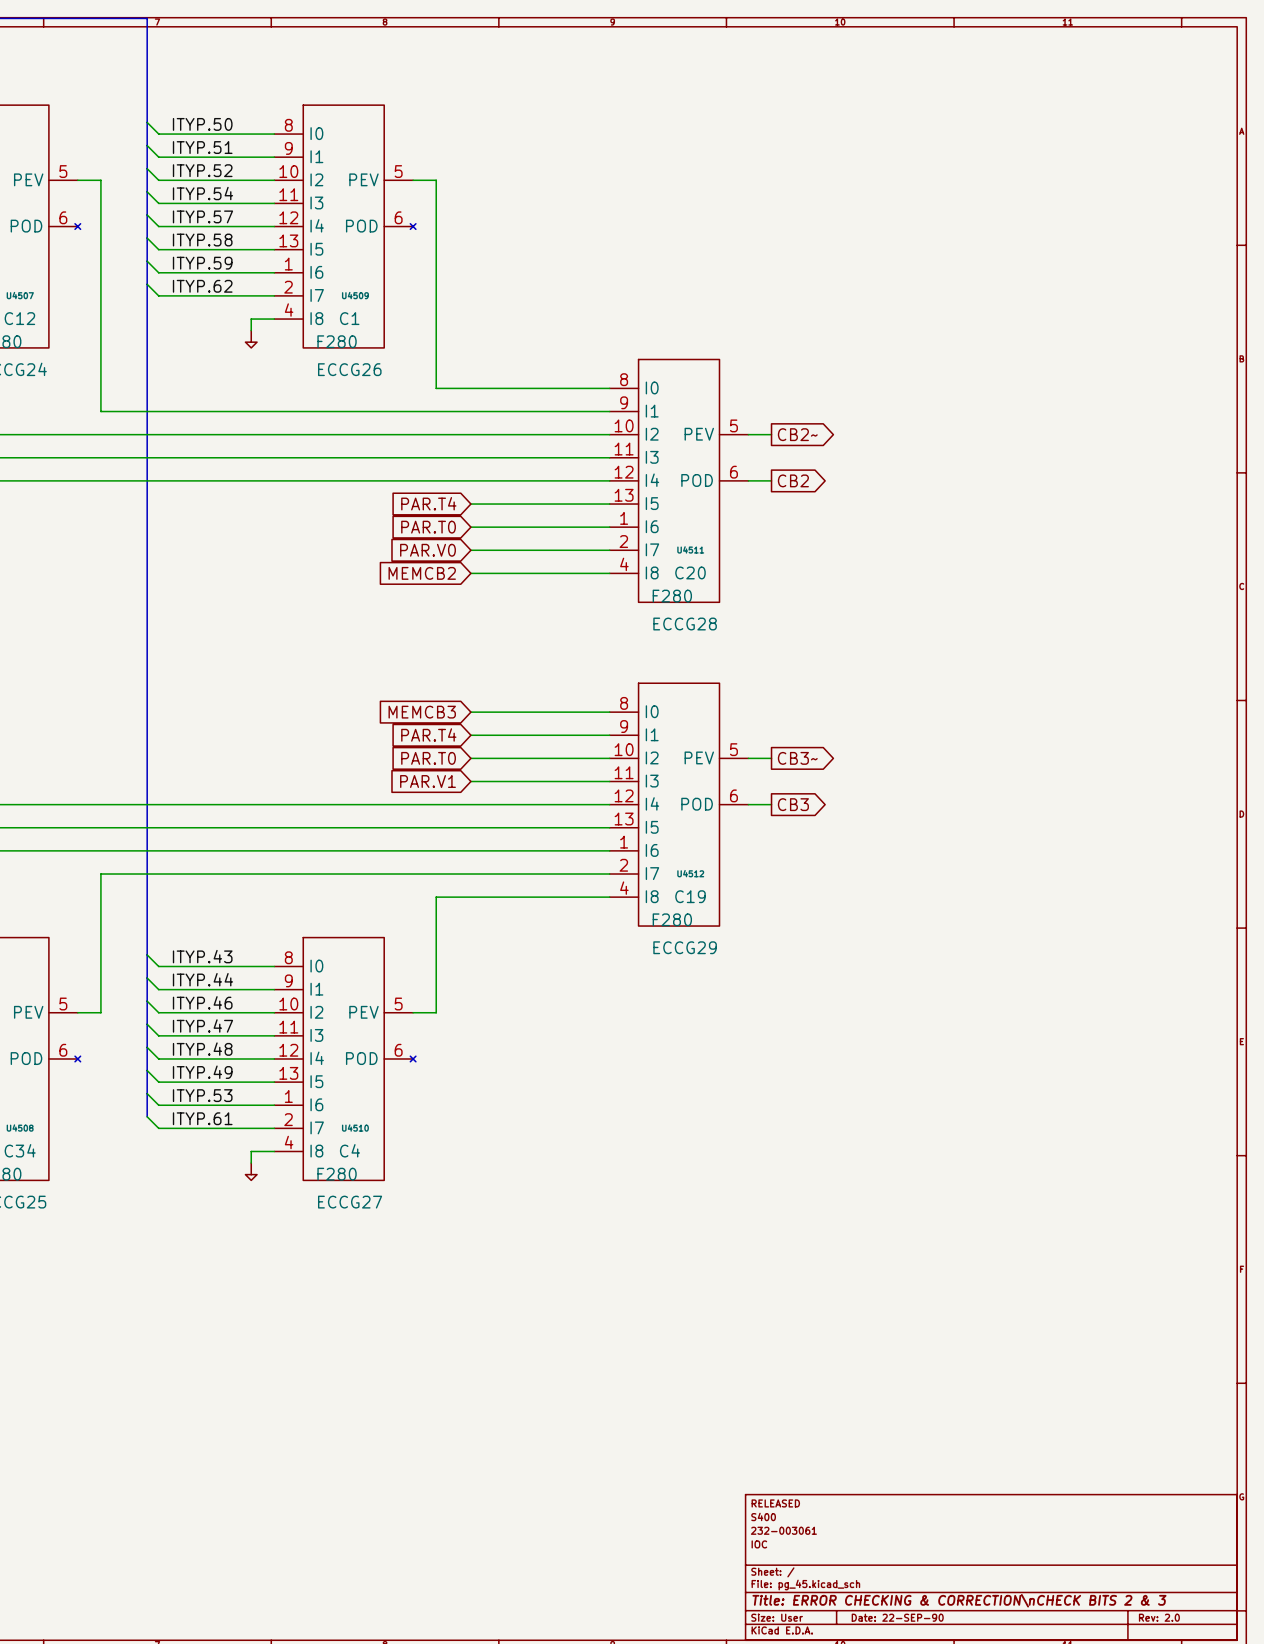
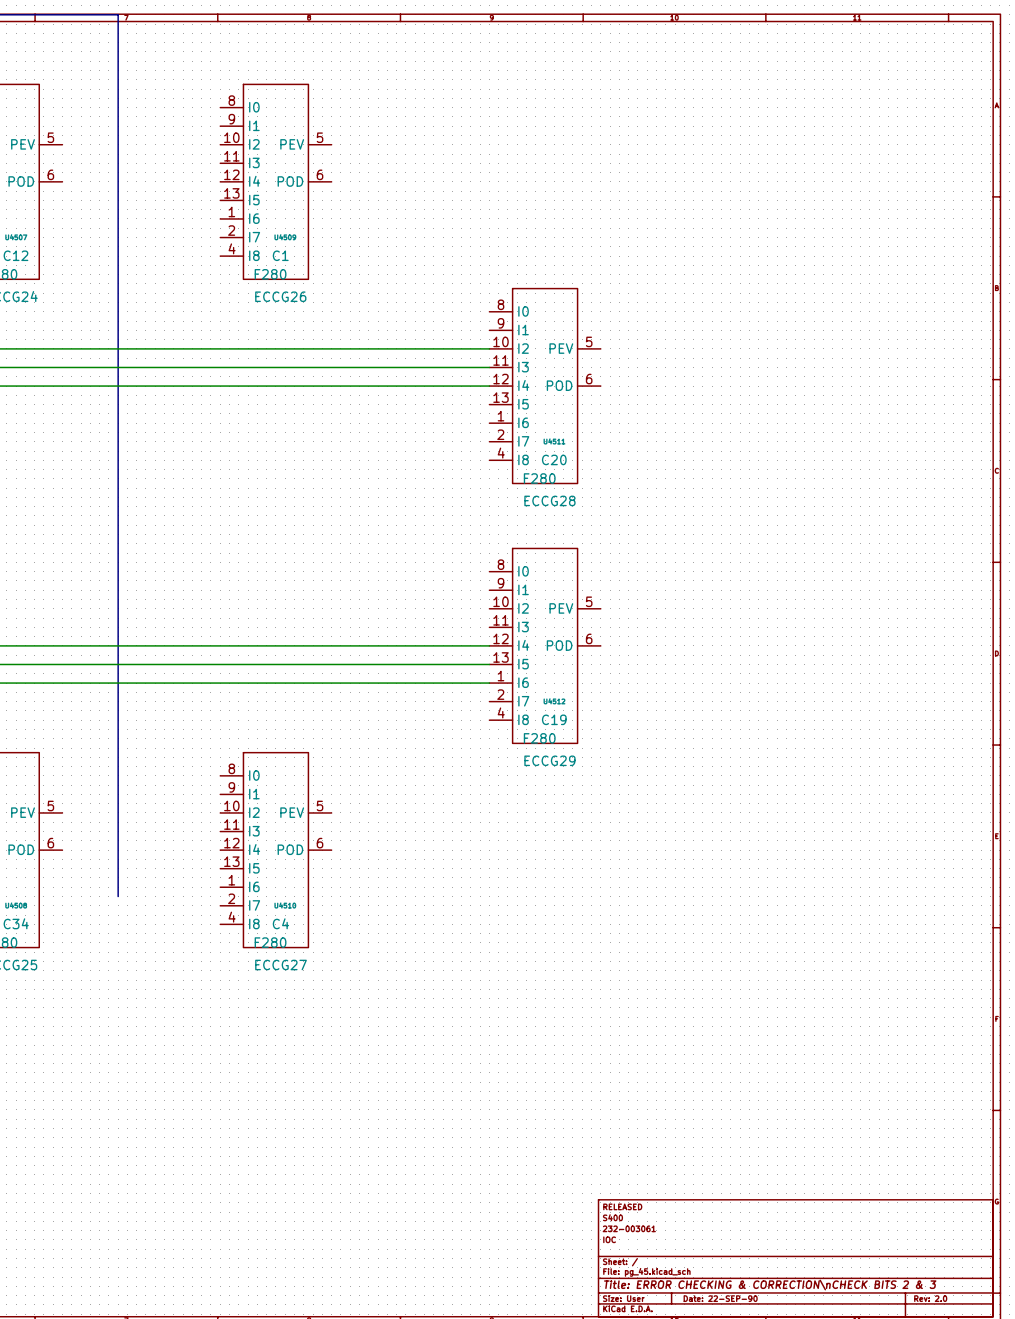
wire: (147, 122) (158, 134) (274, 134) -> none
label: ITYP.50 (202, 124) -> none
wire: (147, 145) (158, 157) (274, 157) -> none
label: ITYP.51 (202, 147) -> none
wire: (147, 168) (158, 180) (274, 180) -> none
label: ITYP.52 (202, 170) -> none
wire: (77, 180) (100, 180) (100, 411) (609, 411) -> none
wire: (413, 180) (436, 180) (436, 388) (609, 388) -> none
wire: (147, 191) (158, 203) (274, 203) -> none
label: ITYP.54 (202, 193) -> none
wire: (147, 214) (158, 226) (274, 226) -> none
label: ITYP.57 (202, 216) -> none
no-connect mark: (77, 226) -> none
no-connect mark: (413, 226) -> none
wire: (147, 238) (158, 249) (274, 249) -> none
label: ITYP.58 (202, 240) -> none
wire: (147, 261) (158, 272) (274, 272) -> none
label: ITYP.59 (202, 263) -> none
wire: (147, 284) (158, 295) (274, 295) -> none
label: ITYP.62 (202, 286) -> none
wire: (274, 319) (251, 319) (251, 330) -> none
power symbol: (251, 339) -> none
wire: (748, 434) (771, 434) -> none
global label: CB2~ (797, 434) -> none
wire: (748, 480) (771, 480) -> none
global label: CB2 (793, 480) -> none
global label: PAR.T4 (428, 503) -> none
wire: (470, 504) (609, 504) -> none
global label: PAR.T0 (428, 527) -> none
wire: (470, 527) (609, 527) -> none
global label: PAR.V0 (427, 550) -> none
wire: (470, 550) (609, 550) -> none
global label: MEMCB2 (422, 573) -> none
wire: (470, 573) (609, 573) -> none
global label: MEMCB3 (422, 712) -> none
wire: (470, 712) (609, 712) -> none
global label: PAR.T4 (428, 734) -> none
wire: (470, 735) (609, 735) -> none
global label: PAR.T0 (428, 758) -> none
wire: (470, 758) (609, 758) -> none
wire: (748, 758) (771, 758) -> none
global label: CB3~ (797, 758) -> none
global label: PAR.V1 (427, 781) -> none
wire: (470, 781) (609, 781) -> none
wire: (748, 804) (771, 804) -> none
global label: CB3 (793, 804) -> none
wire: (609, 874) (100, 874) (100, 1012) (77, 1012) -> none
wire: (609, 897) (436, 897) (436, 1012) (413, 1012) -> none
wire: (147, 954) (158, 966) (274, 966) -> none
label: ITYP.43 (202, 956) -> none
wire: (147, 978) (158, 989) (274, 989) -> none
label: ITYP.44 (202, 979) -> none
wire: (147, 1001) (158, 1012) (274, 1012) -> none
label: ITYP.46 (202, 1002) -> none
wire: (147, 1024) (158, 1035) (274, 1035) -> none
label: ITYP.47 (202, 1025) -> none
wire: (147, 1047) (158, 1058) (274, 1058) -> none
label: ITYP.48 (202, 1049) -> none
no-connect mark: (77, 1058) -> none
no-connect mark: (413, 1058) -> none
wire: (147, 1070) (158, 1082) (274, 1082) -> none
label: ITYP.49 (202, 1072) -> none
wire: (147, 1093) (158, 1105) (274, 1105) -> none
label: ITYP.53 (202, 1095) -> none
wire: (147, 1116) (158, 1128) (274, 1128) -> none
label: ITYP.61 (202, 1118) -> none
wire: (274, 1151) (251, 1151) (251, 1163) -> none
power symbol: (251, 1171) -> none

